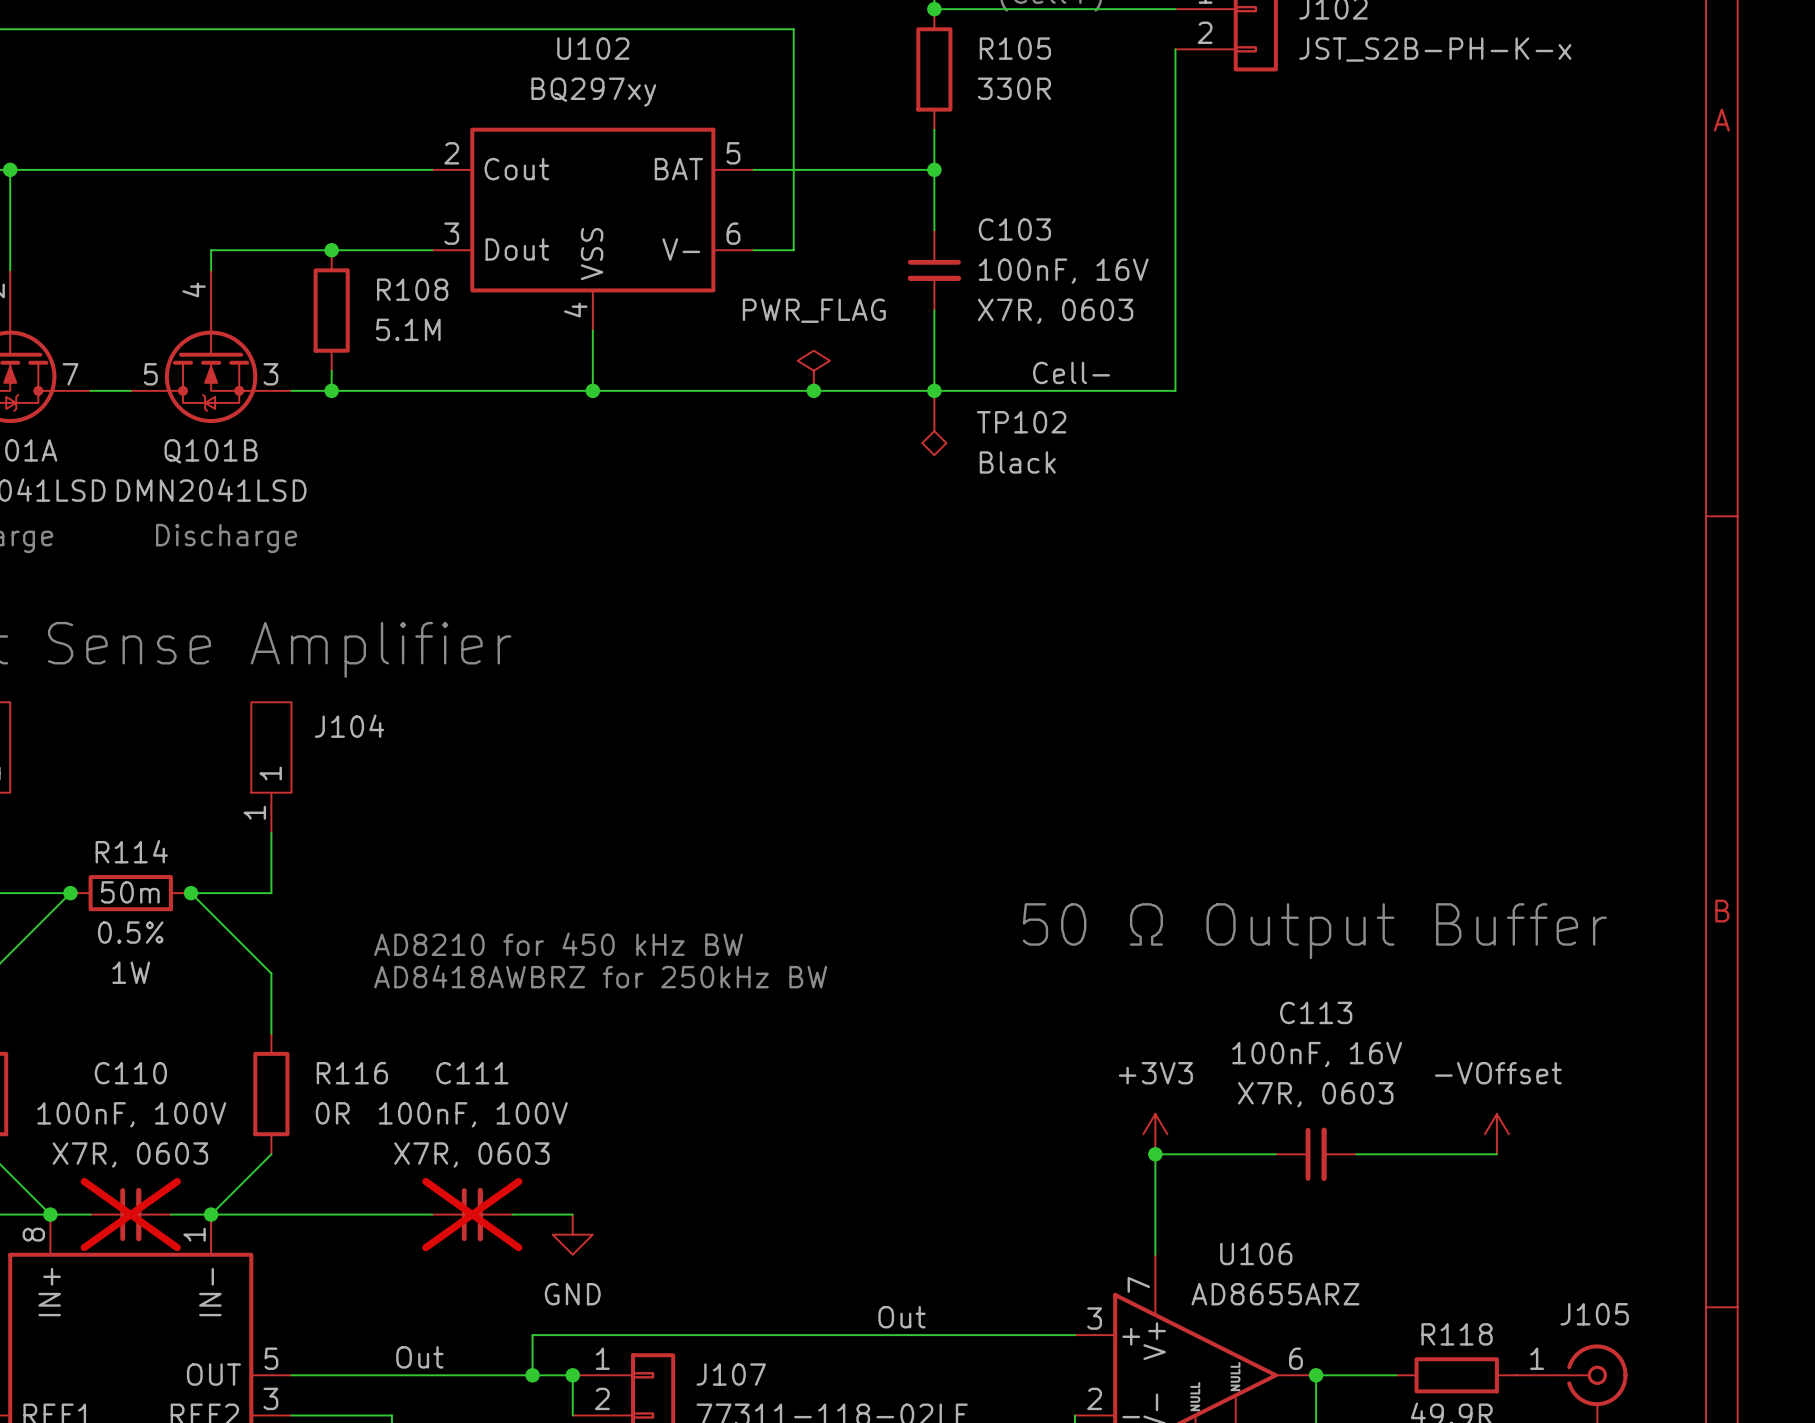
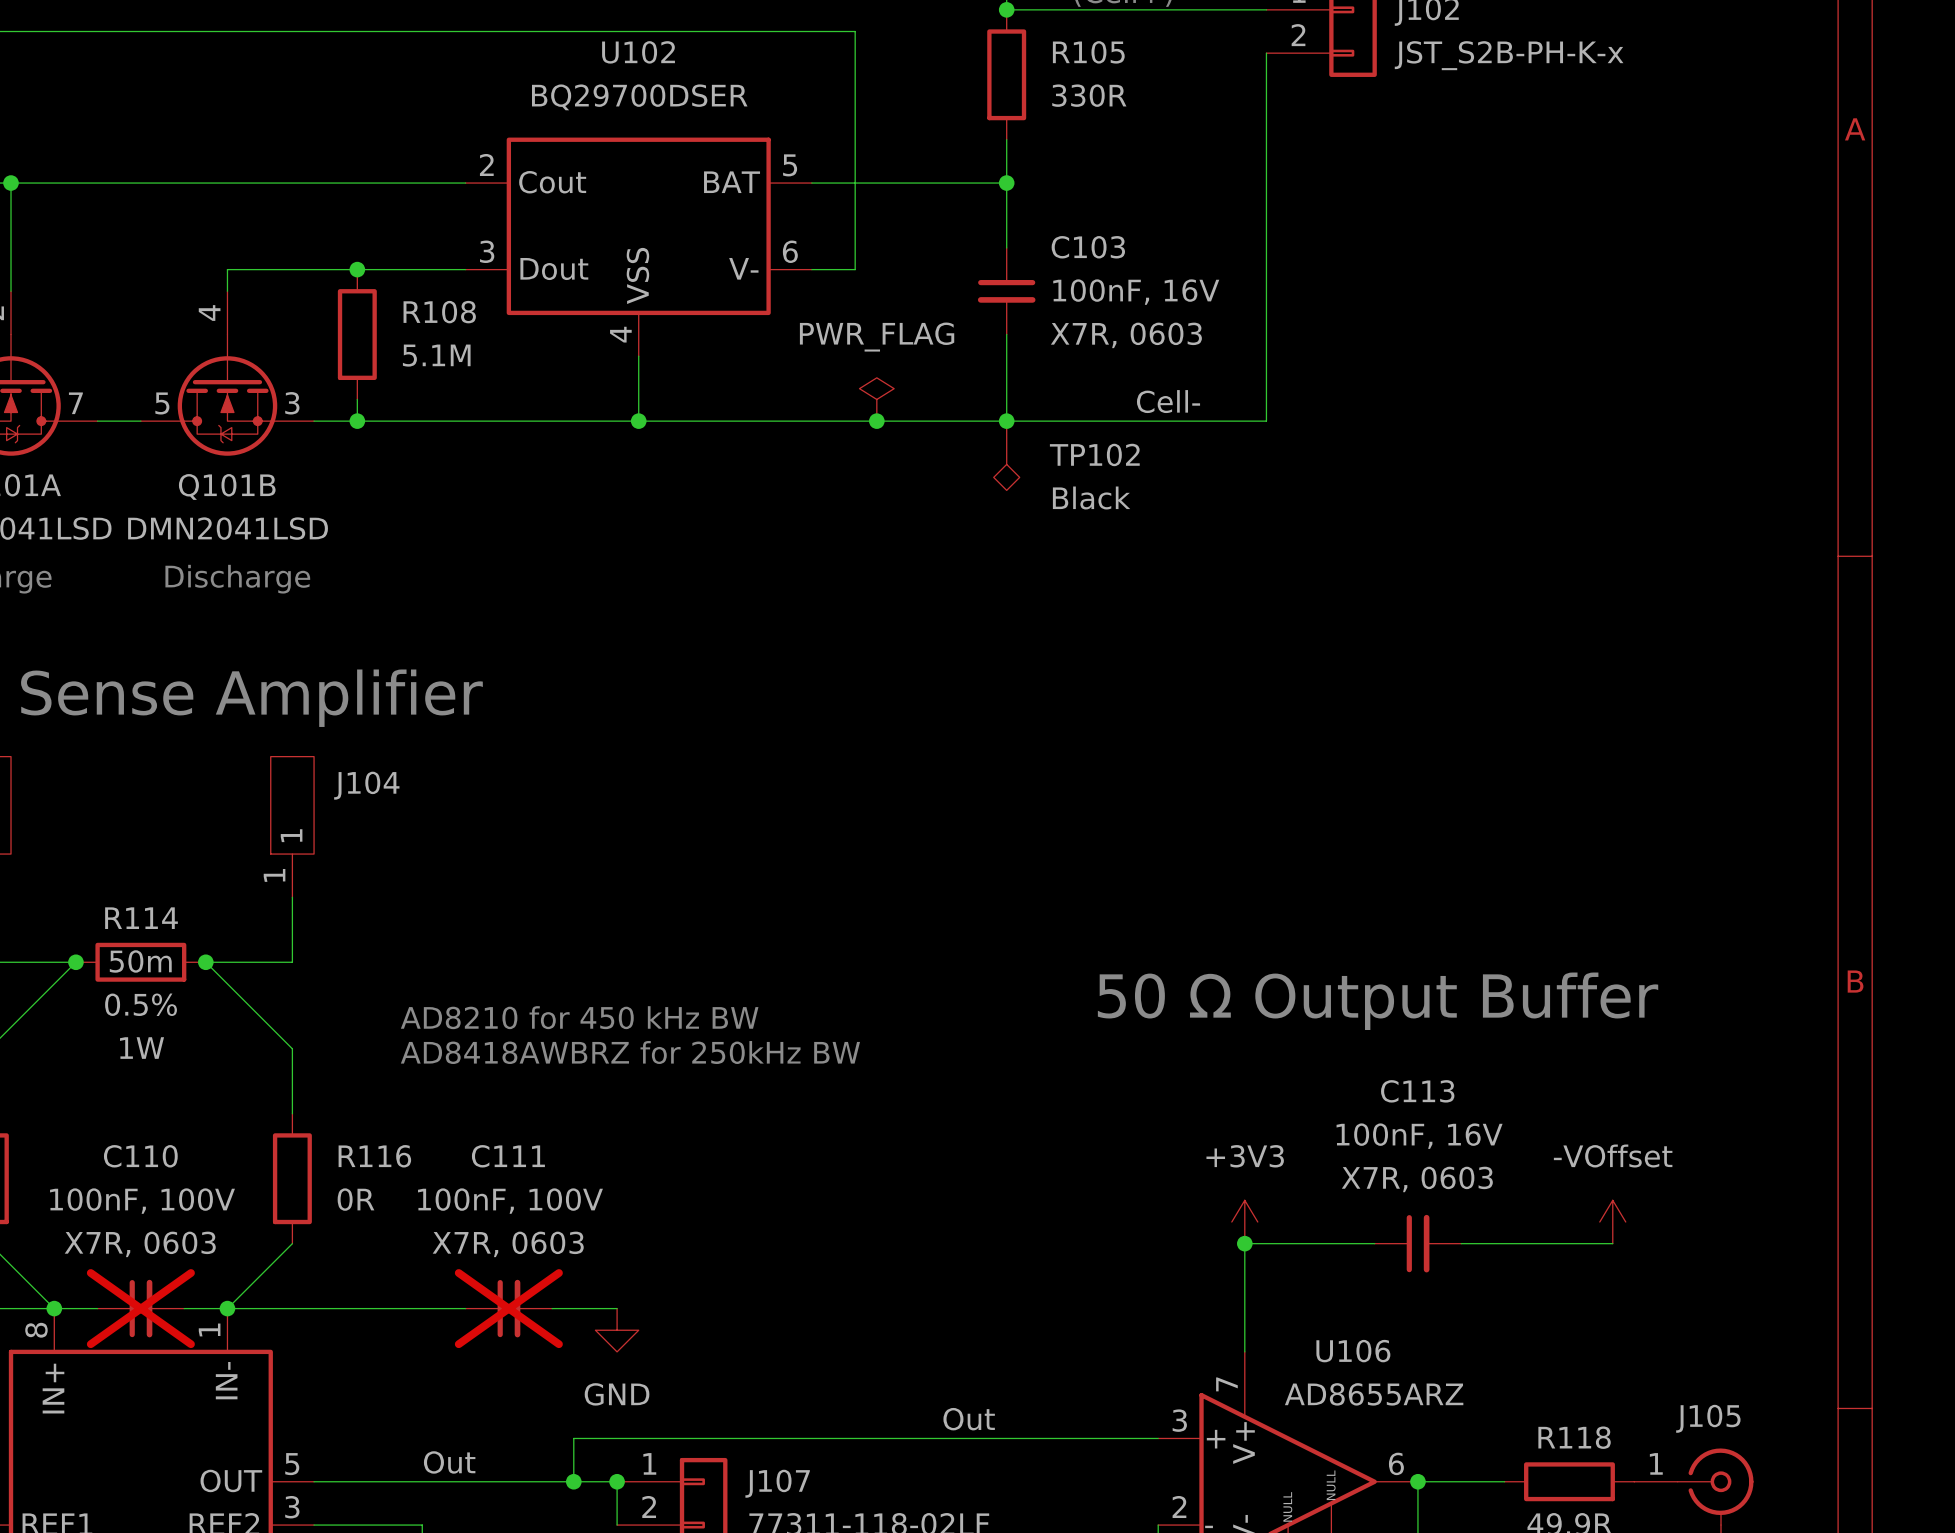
U102 value: BQ297xy (593, 92) -> BQ29700DSER (639, 97)

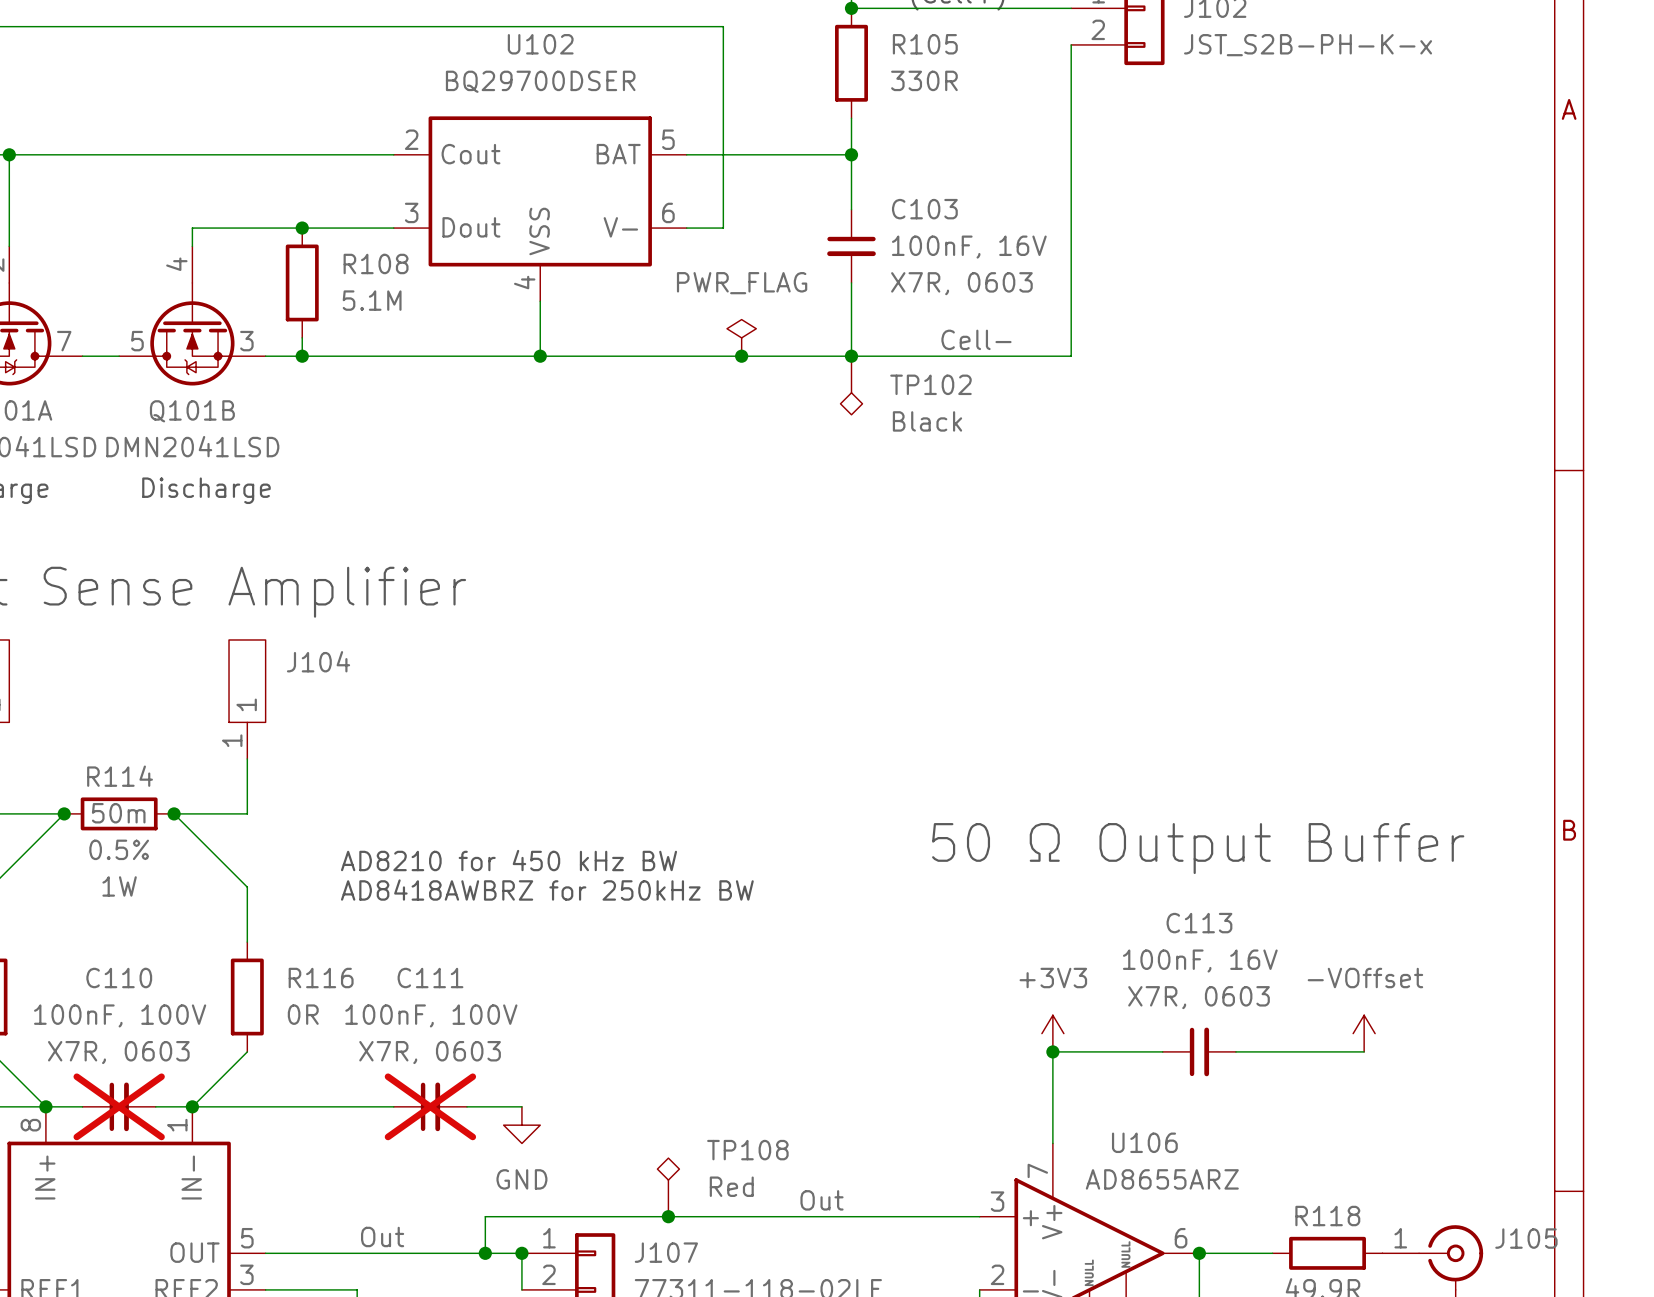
TP108: none -> (668, 1187)
J105 name position: J105 (1708, 1418) -> J105 (1526, 1238)
junction: none -> (668, 1216)

